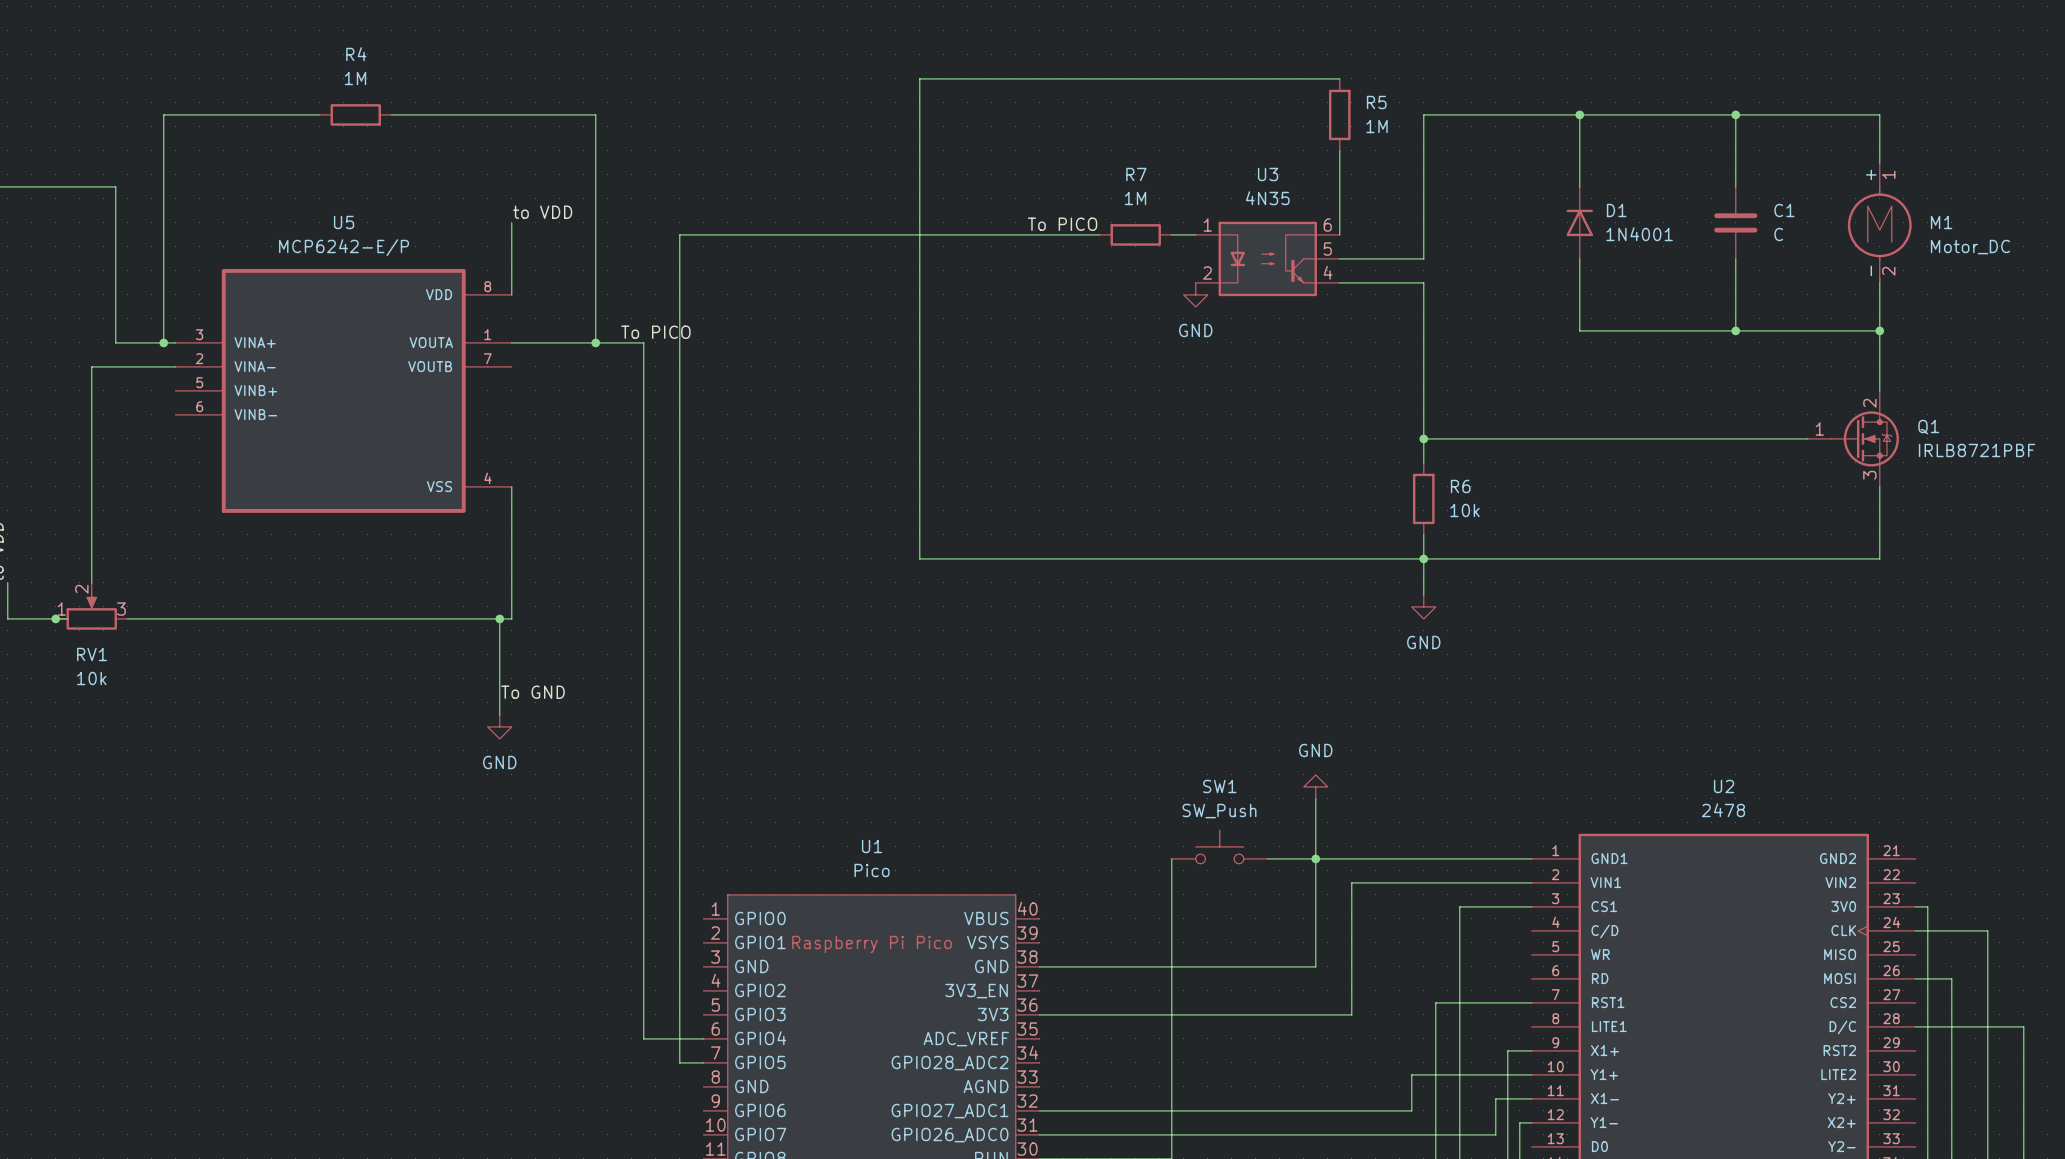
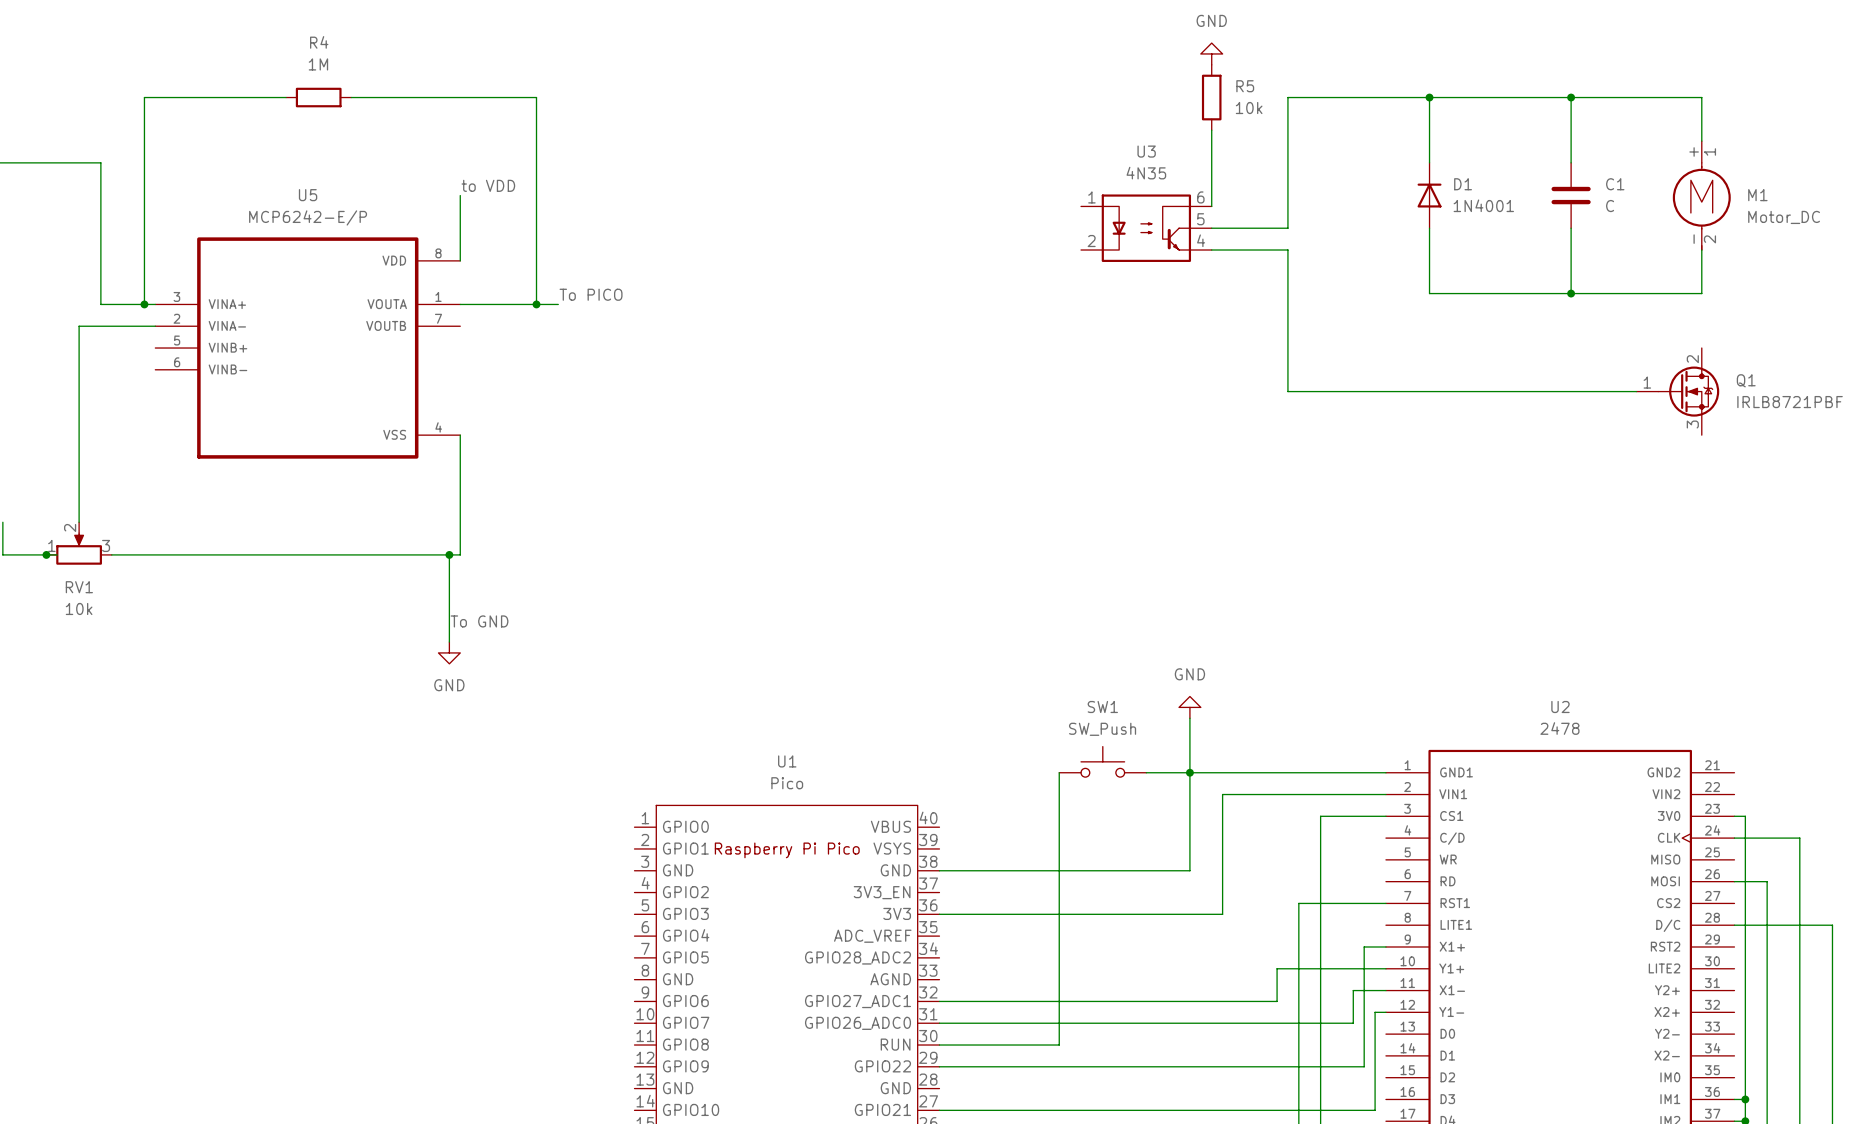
power symbol: none -> GND (1211, 53)
wire: (1339, 78) (919, 78) (919, 558) (1879, 558) (1879, 486) -> none
R5 value: 1M (1377, 126) -> 10k (1249, 108)
label: To PICO (1062, 224) -> none
wire: (1099, 234) (679, 234) (679, 1062) (703, 1062) -> none
R7: 1M (1135, 234) -> none
wire: (1171, 234) (1195, 234) -> none
power symbol: GND (1195, 294) -> none
wire: (1879, 330) (1879, 390) -> none
junction: (1879, 330) -> none
wire: (619, 342) (643, 342) (643, 1038) (703, 1038) -> none
wire: (1423, 438) (1423, 462) -> none
junction: (1423, 438) -> none
R6: 10k (1423, 498) -> none
wire: (1423, 534) (1423, 594) -> none
junction: (1423, 558) -> none
power symbol: GND (1423, 606) -> none

